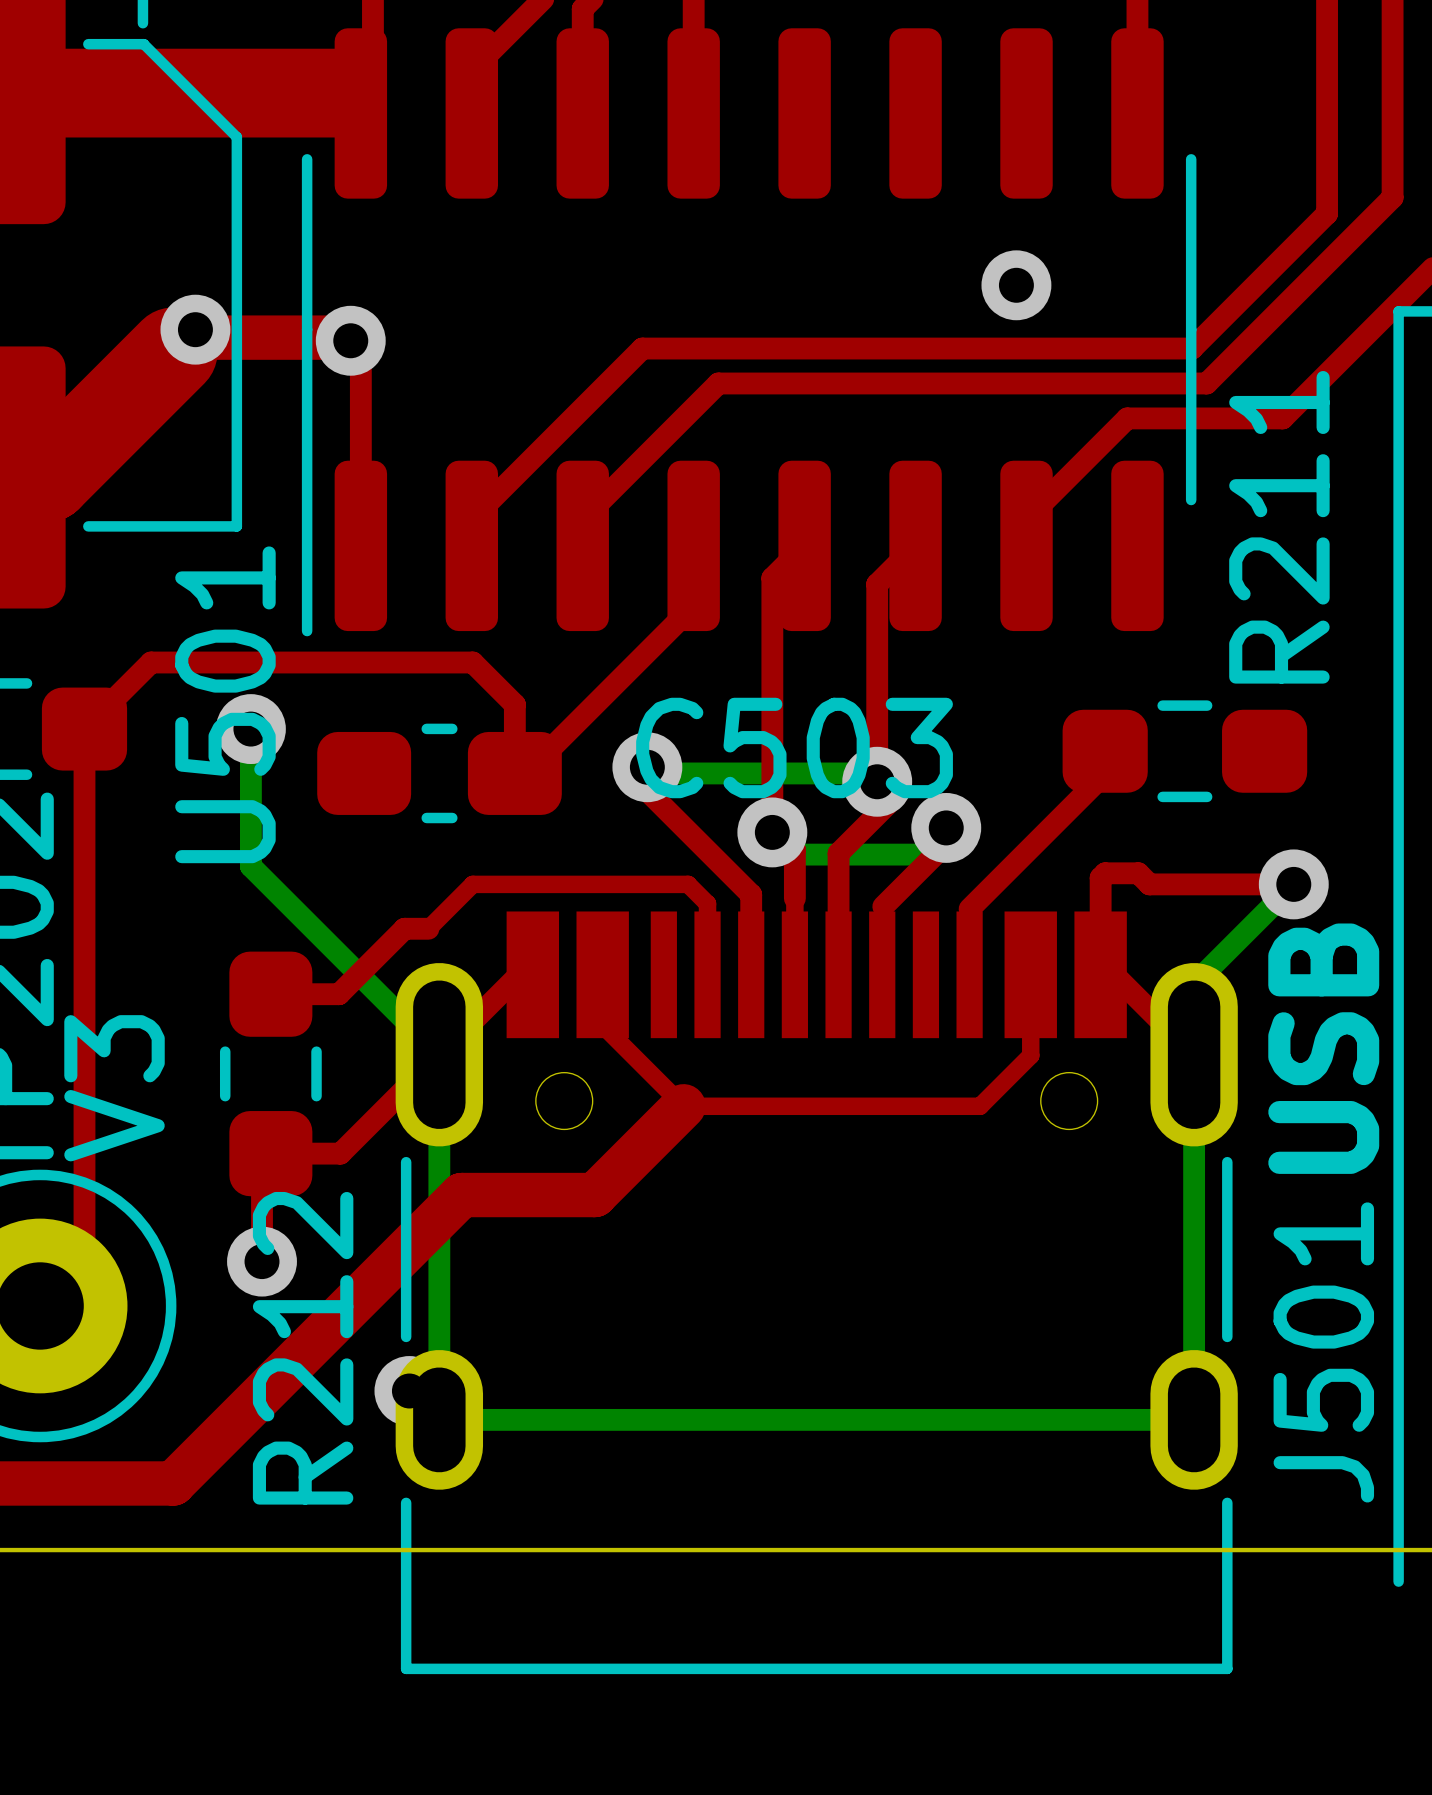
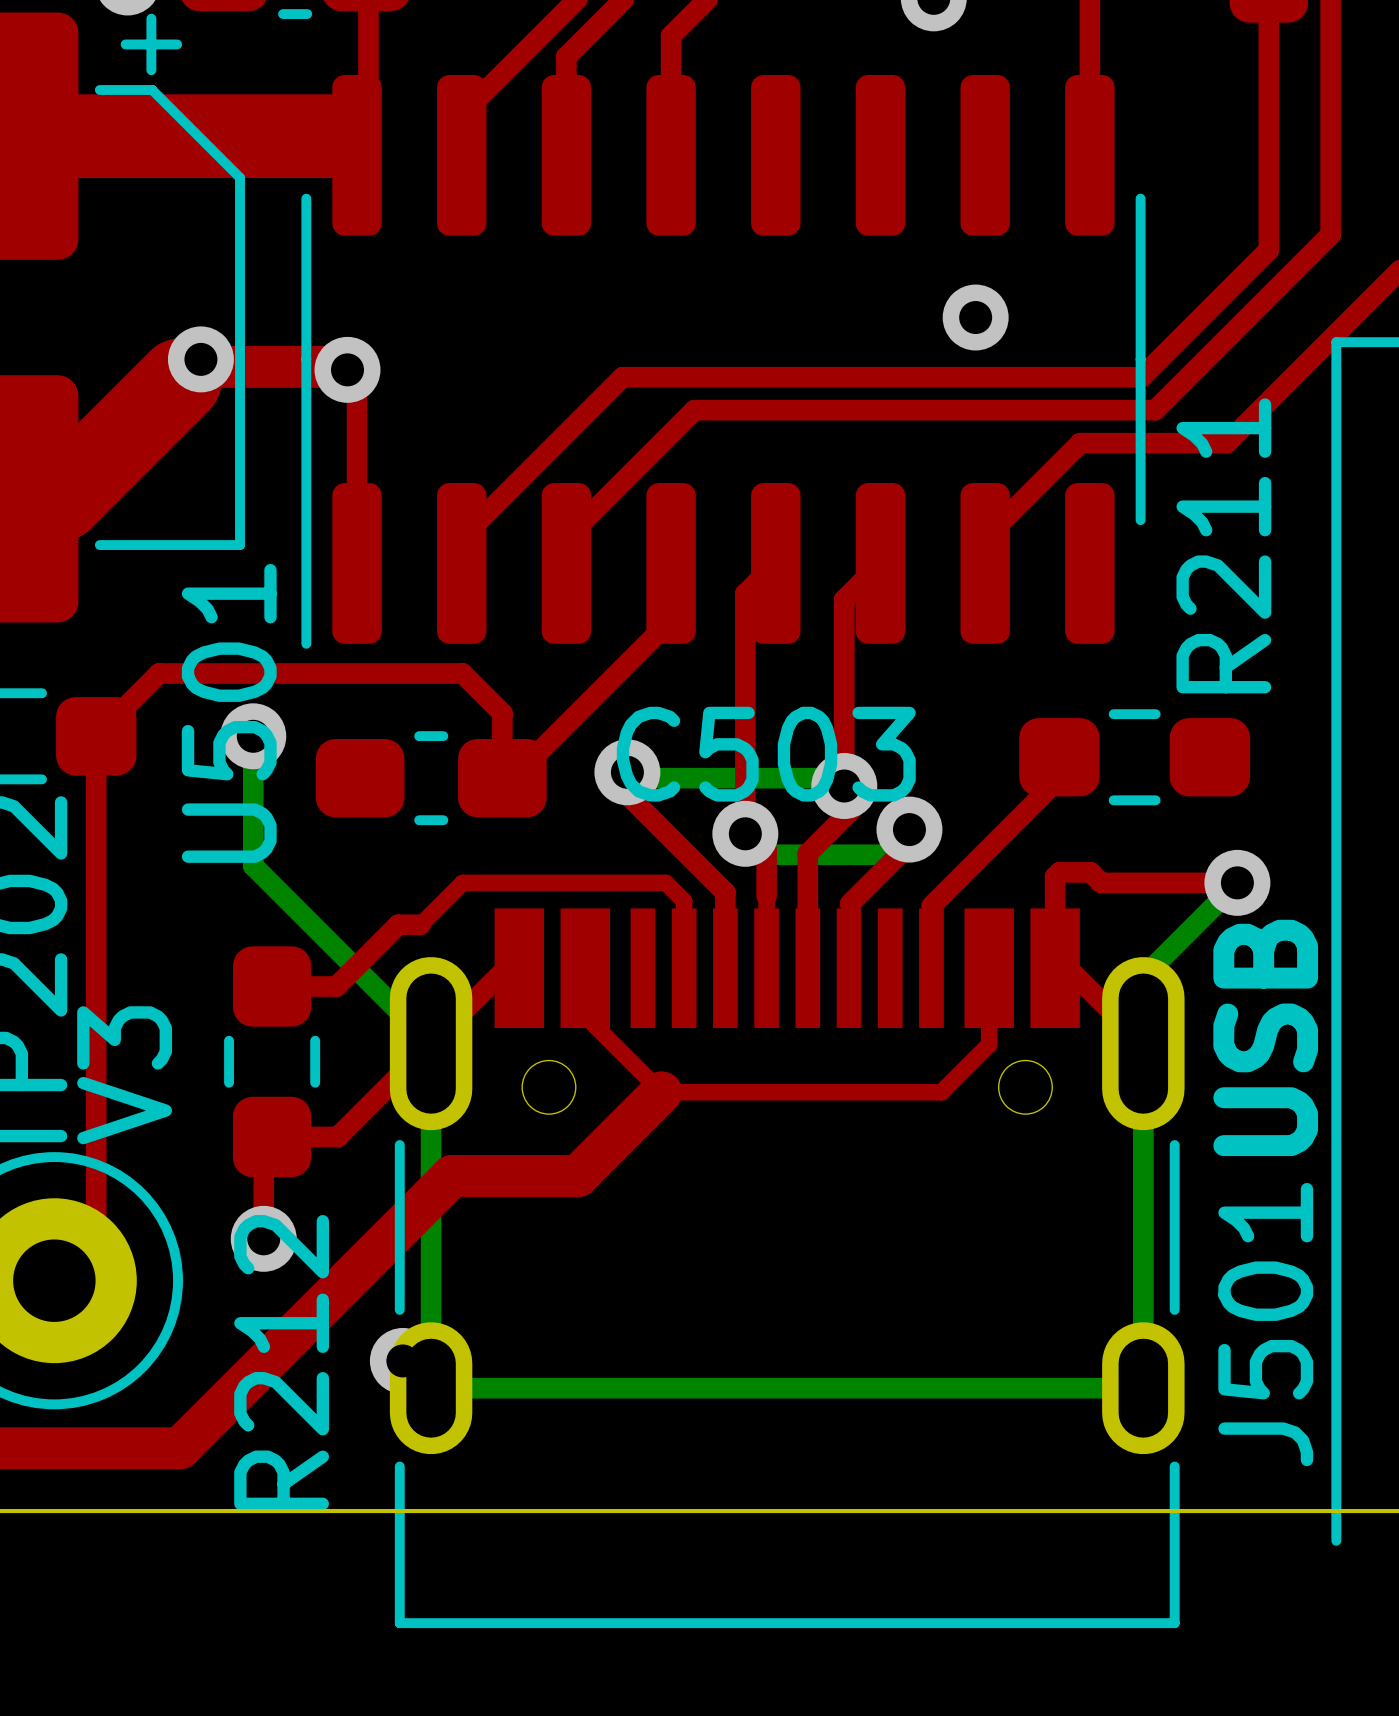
R212 name position: R212 (303, 1348) -> R212 (281, 1362)

